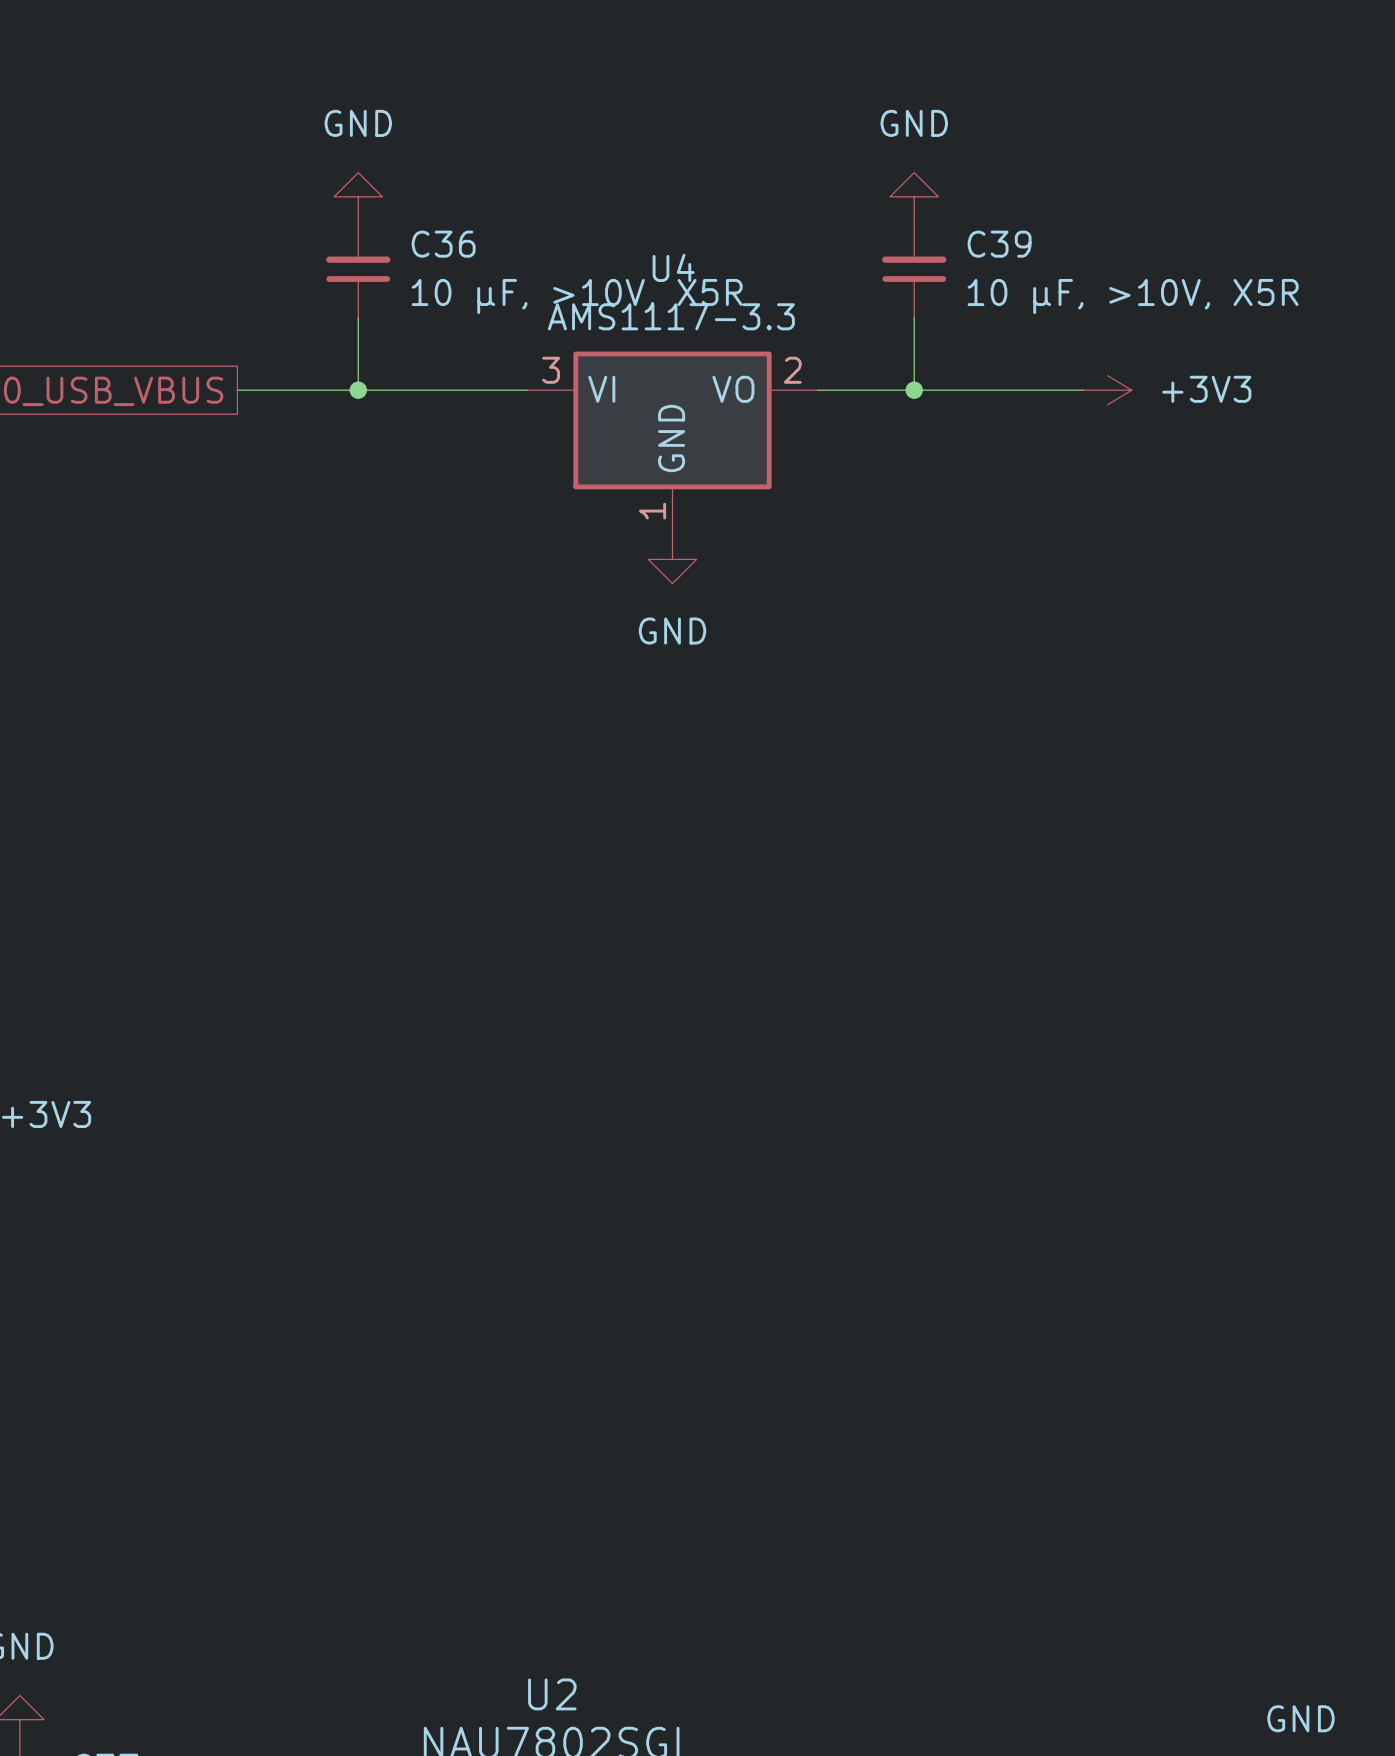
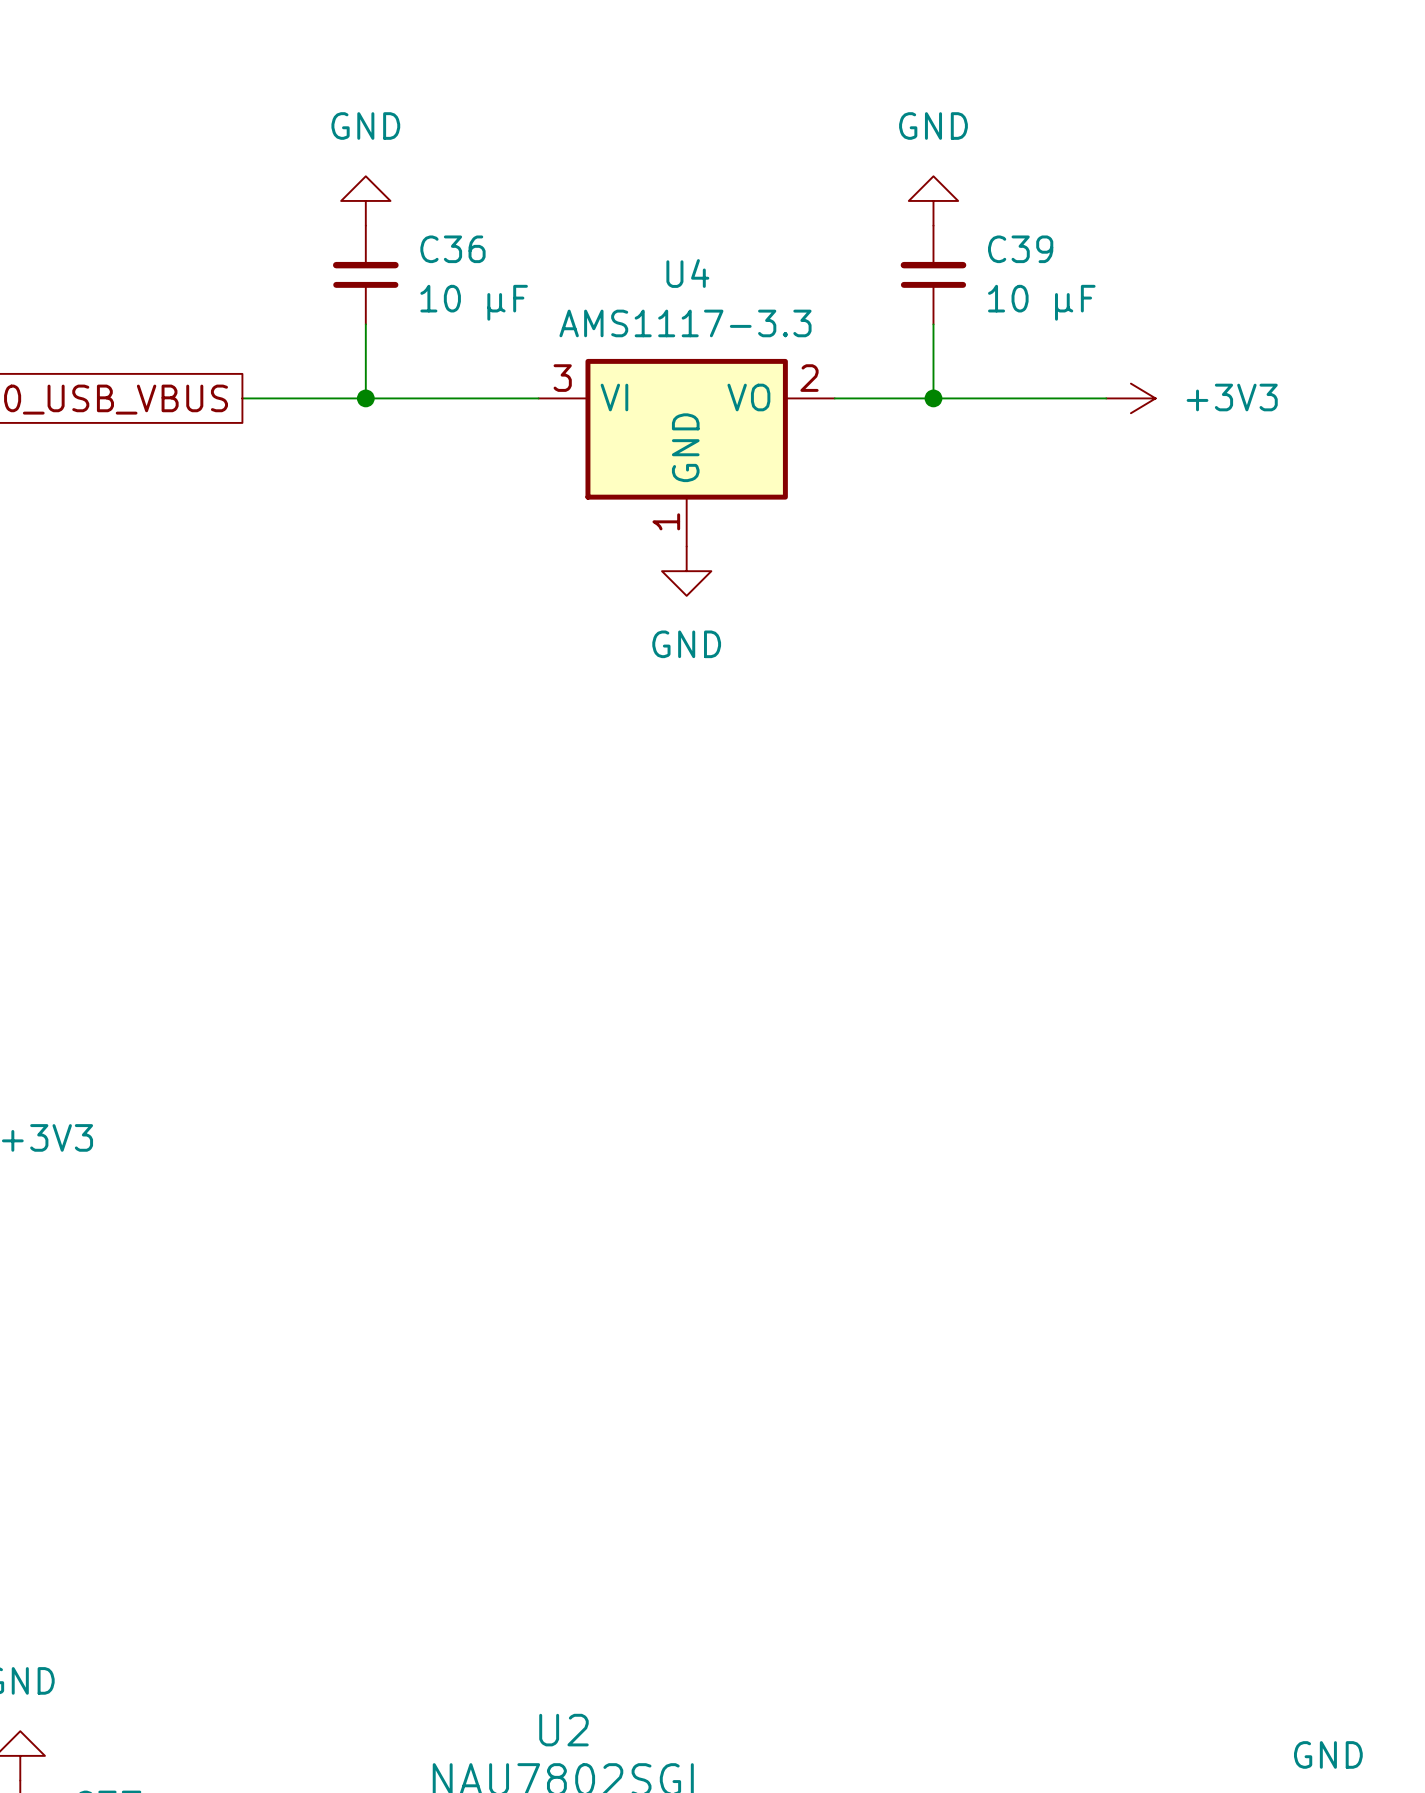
C36 value: 10 µF, >10V, X5R (577, 296) -> 10 µF (474, 302)
C39 value: 10 µF, >10V, X5R (1133, 296) -> 10 µF (1041, 302)

